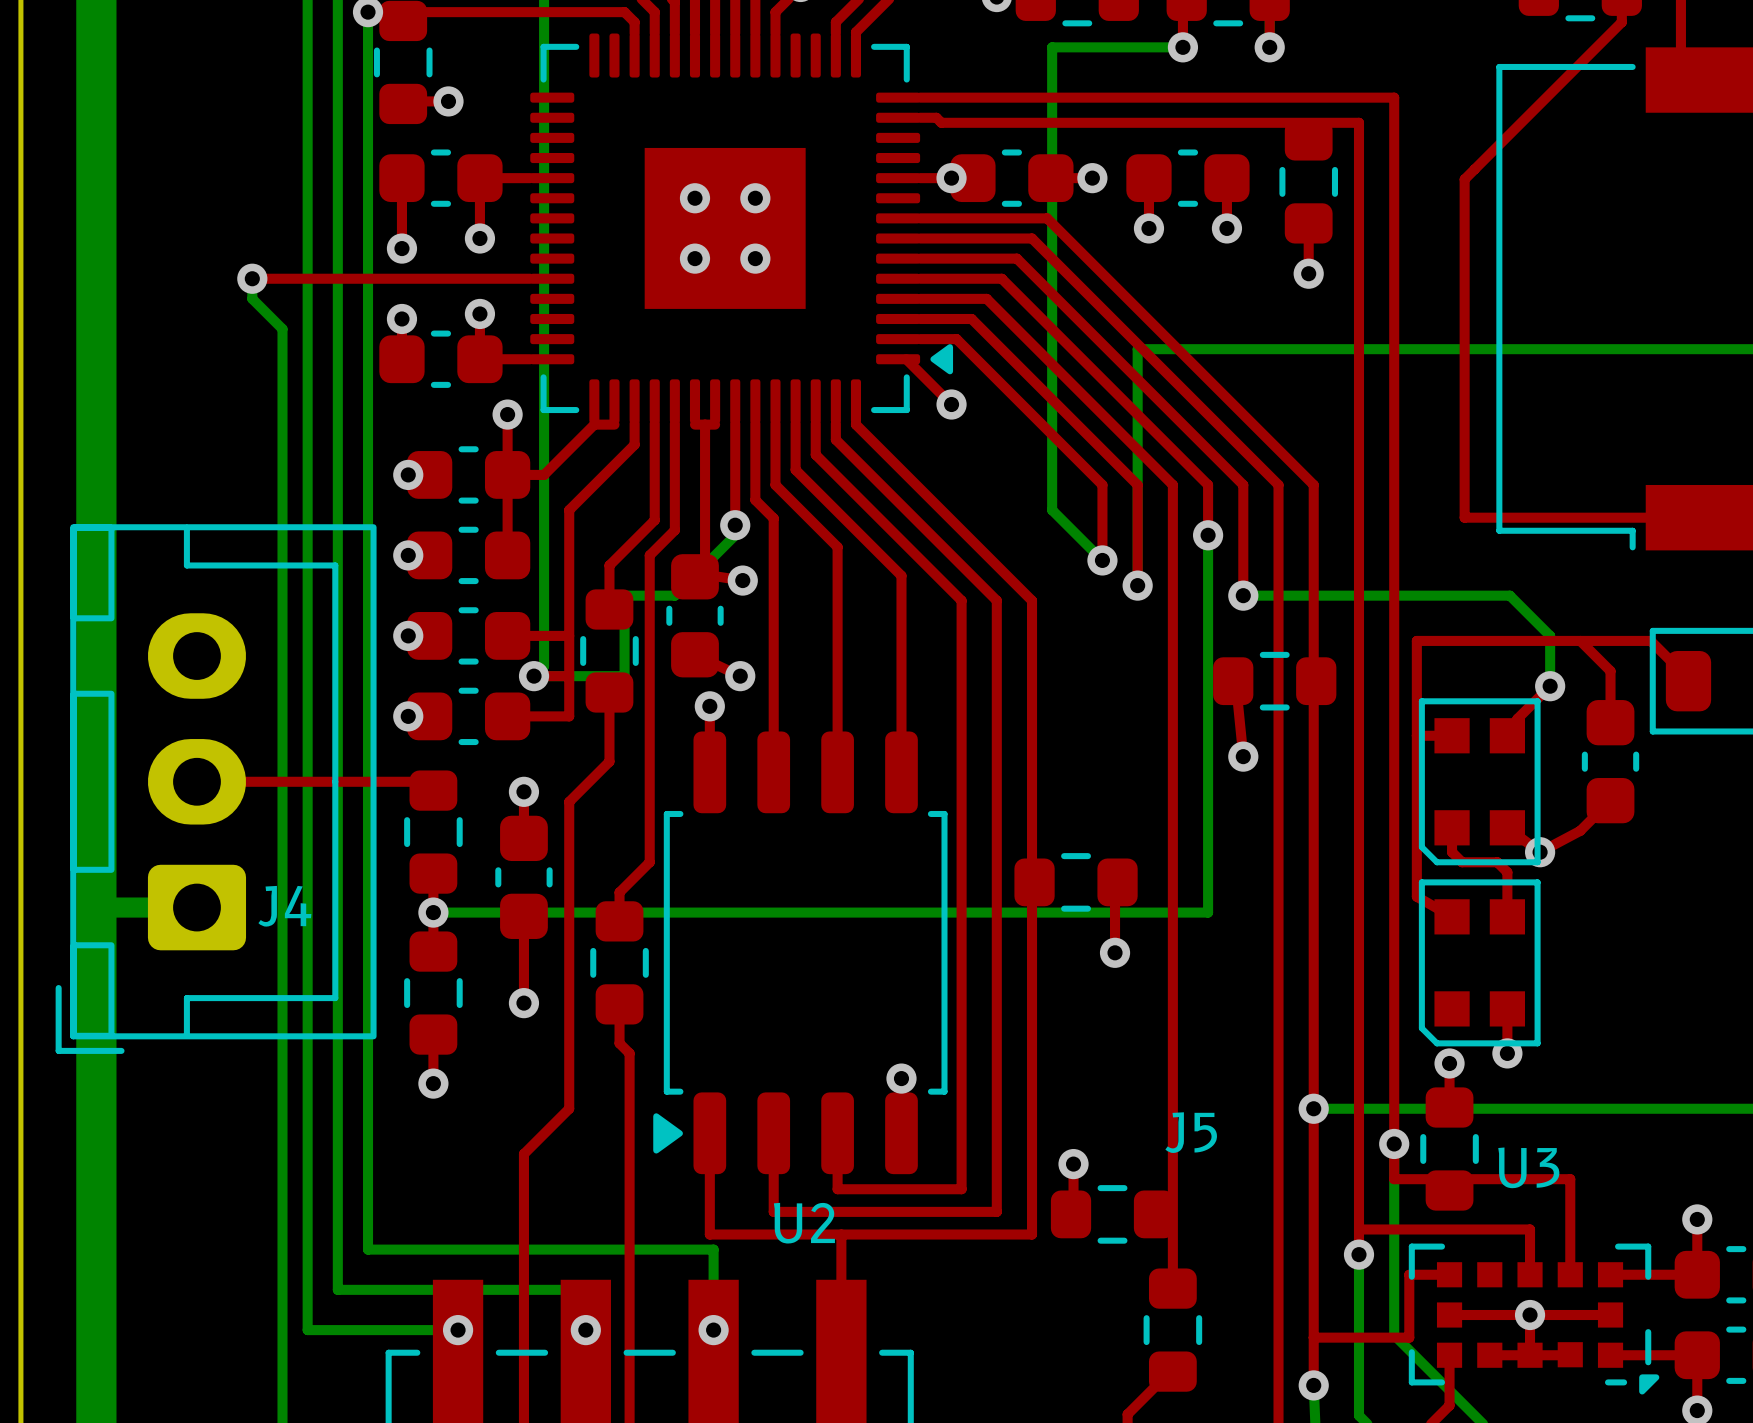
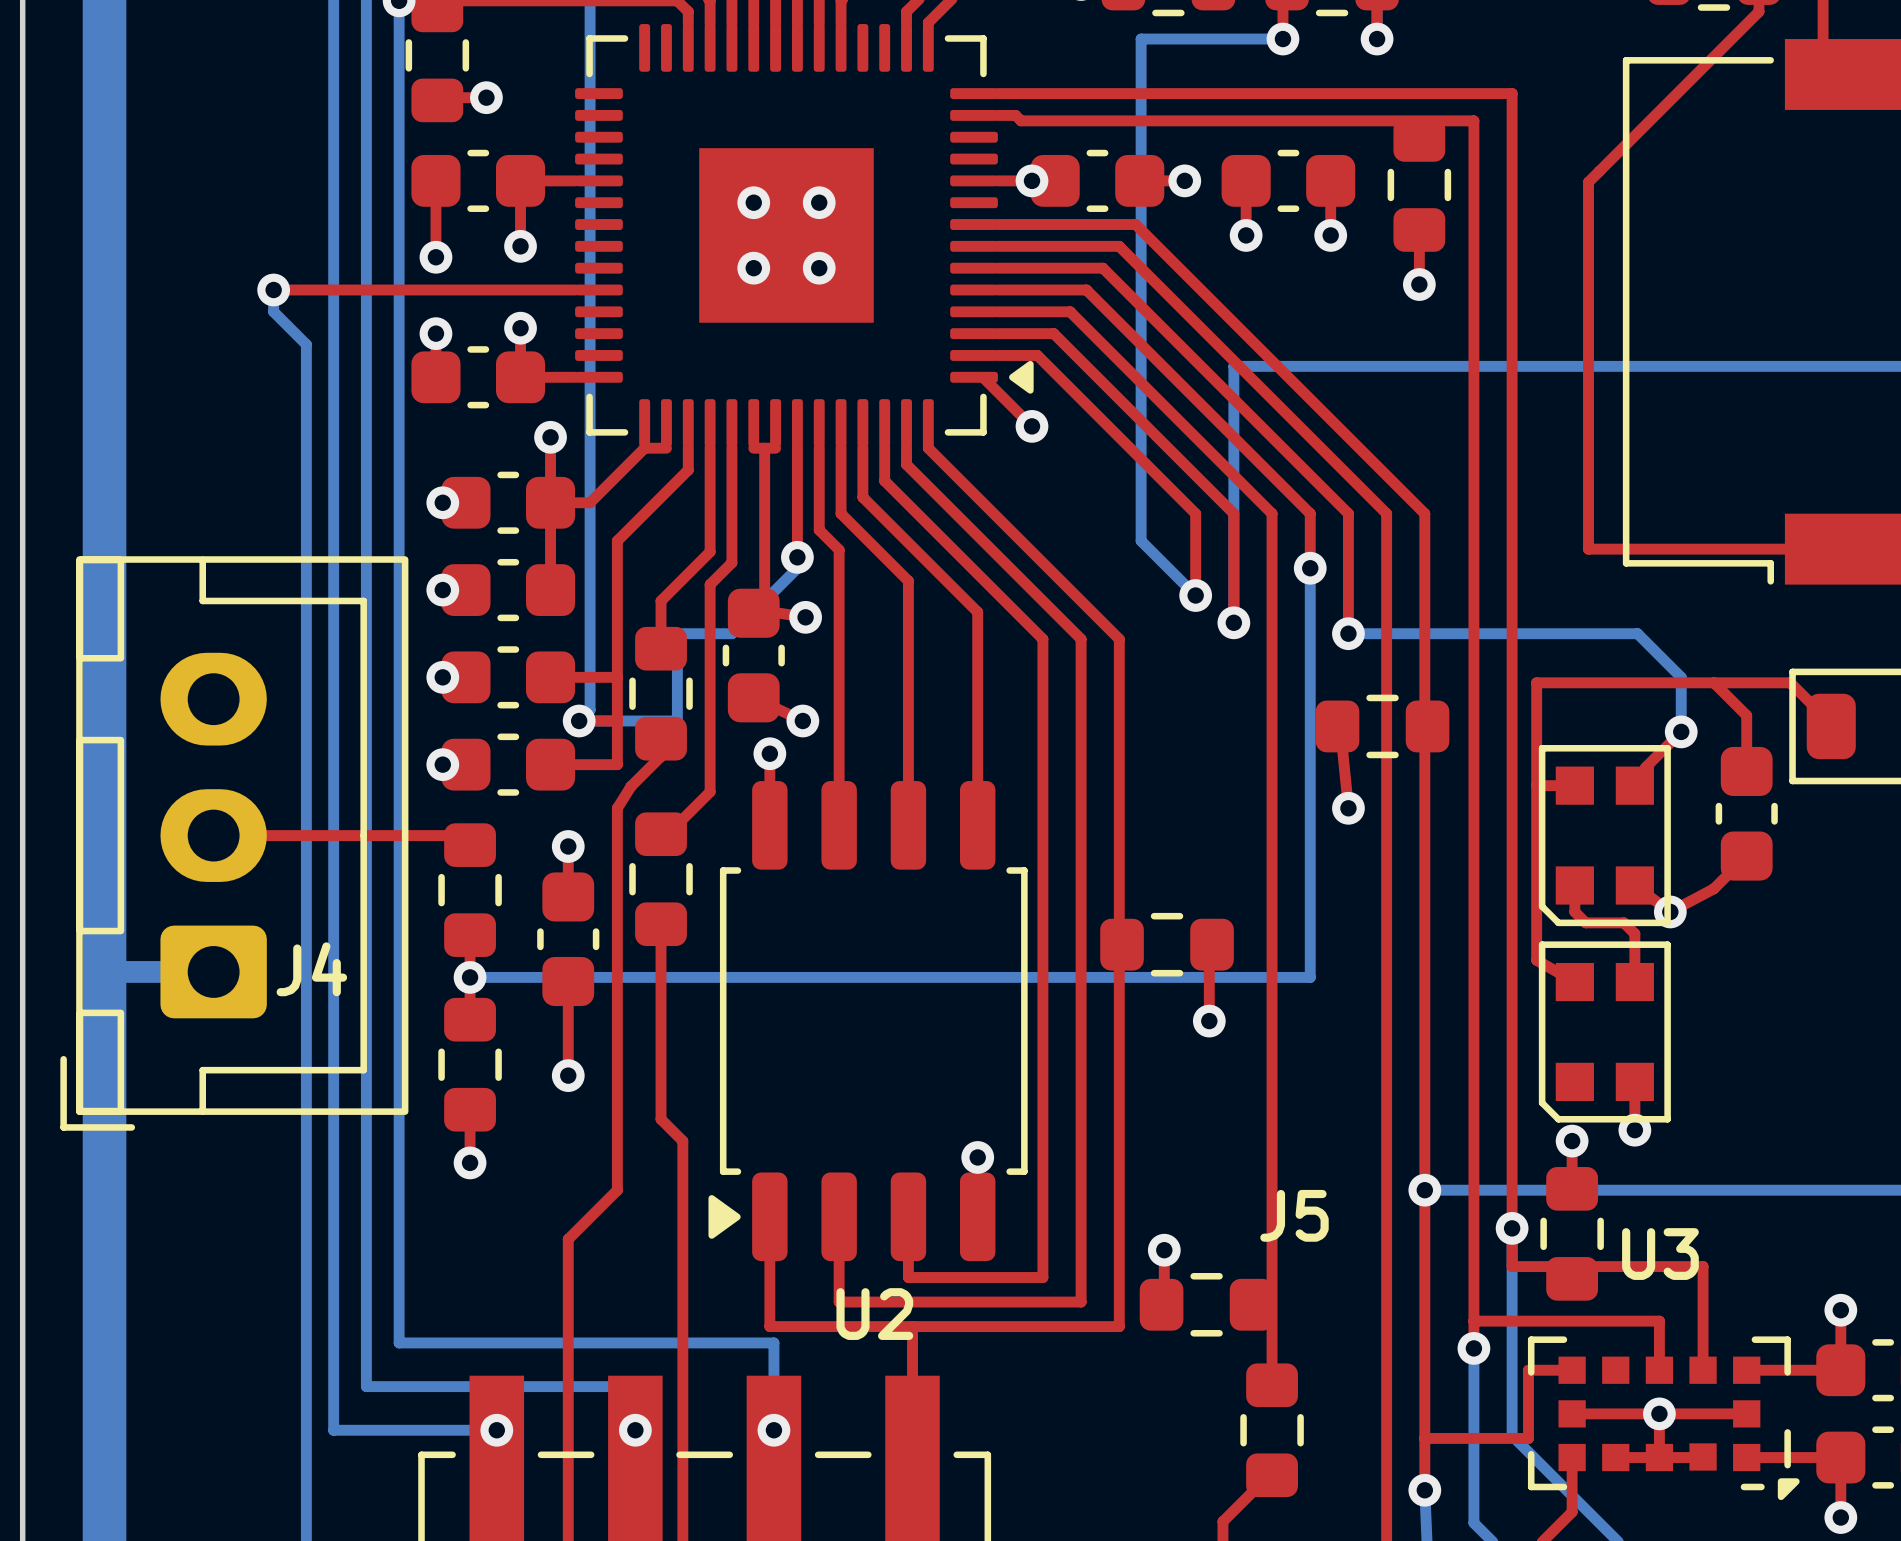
top track: (654, 550) (649, 555) (649, 862) (619, 892) (619, 923) -> (710, 584) (710, 791) (671, 830) (661, 834)
top track: (609, 708) (609, 761) (569, 801) -> (661, 756) (631, 786) (617, 808) (617, 857)
part position: (619, 962) -> (661, 879)
top track: (619, 1001) (619, 1043) (629, 1053) (629, 1063) -> (661, 924) (661, 1119) (682, 1141)

